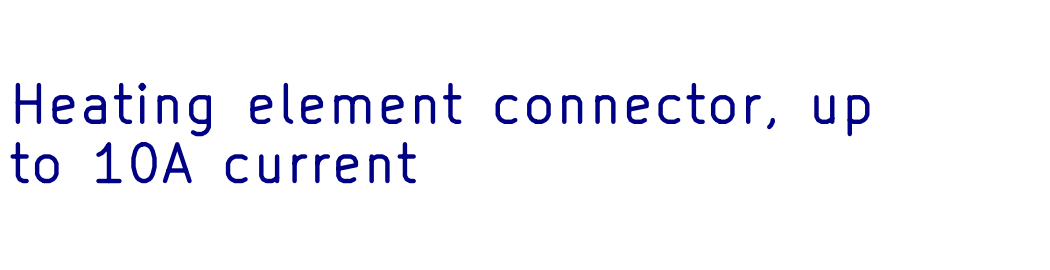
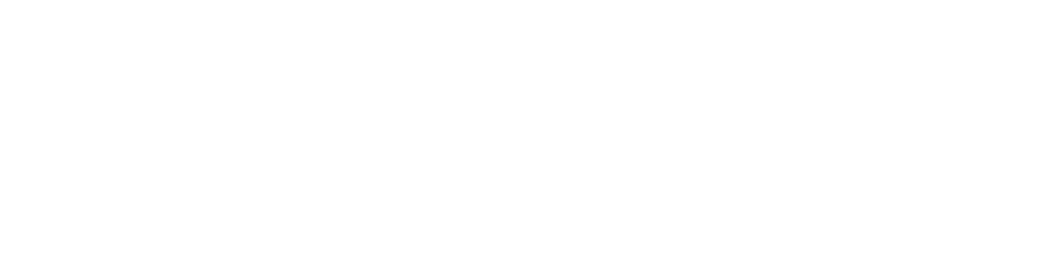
text: Heating element connector, up (442, 109) -> none
text: to 10A current (213, 162) -> none

